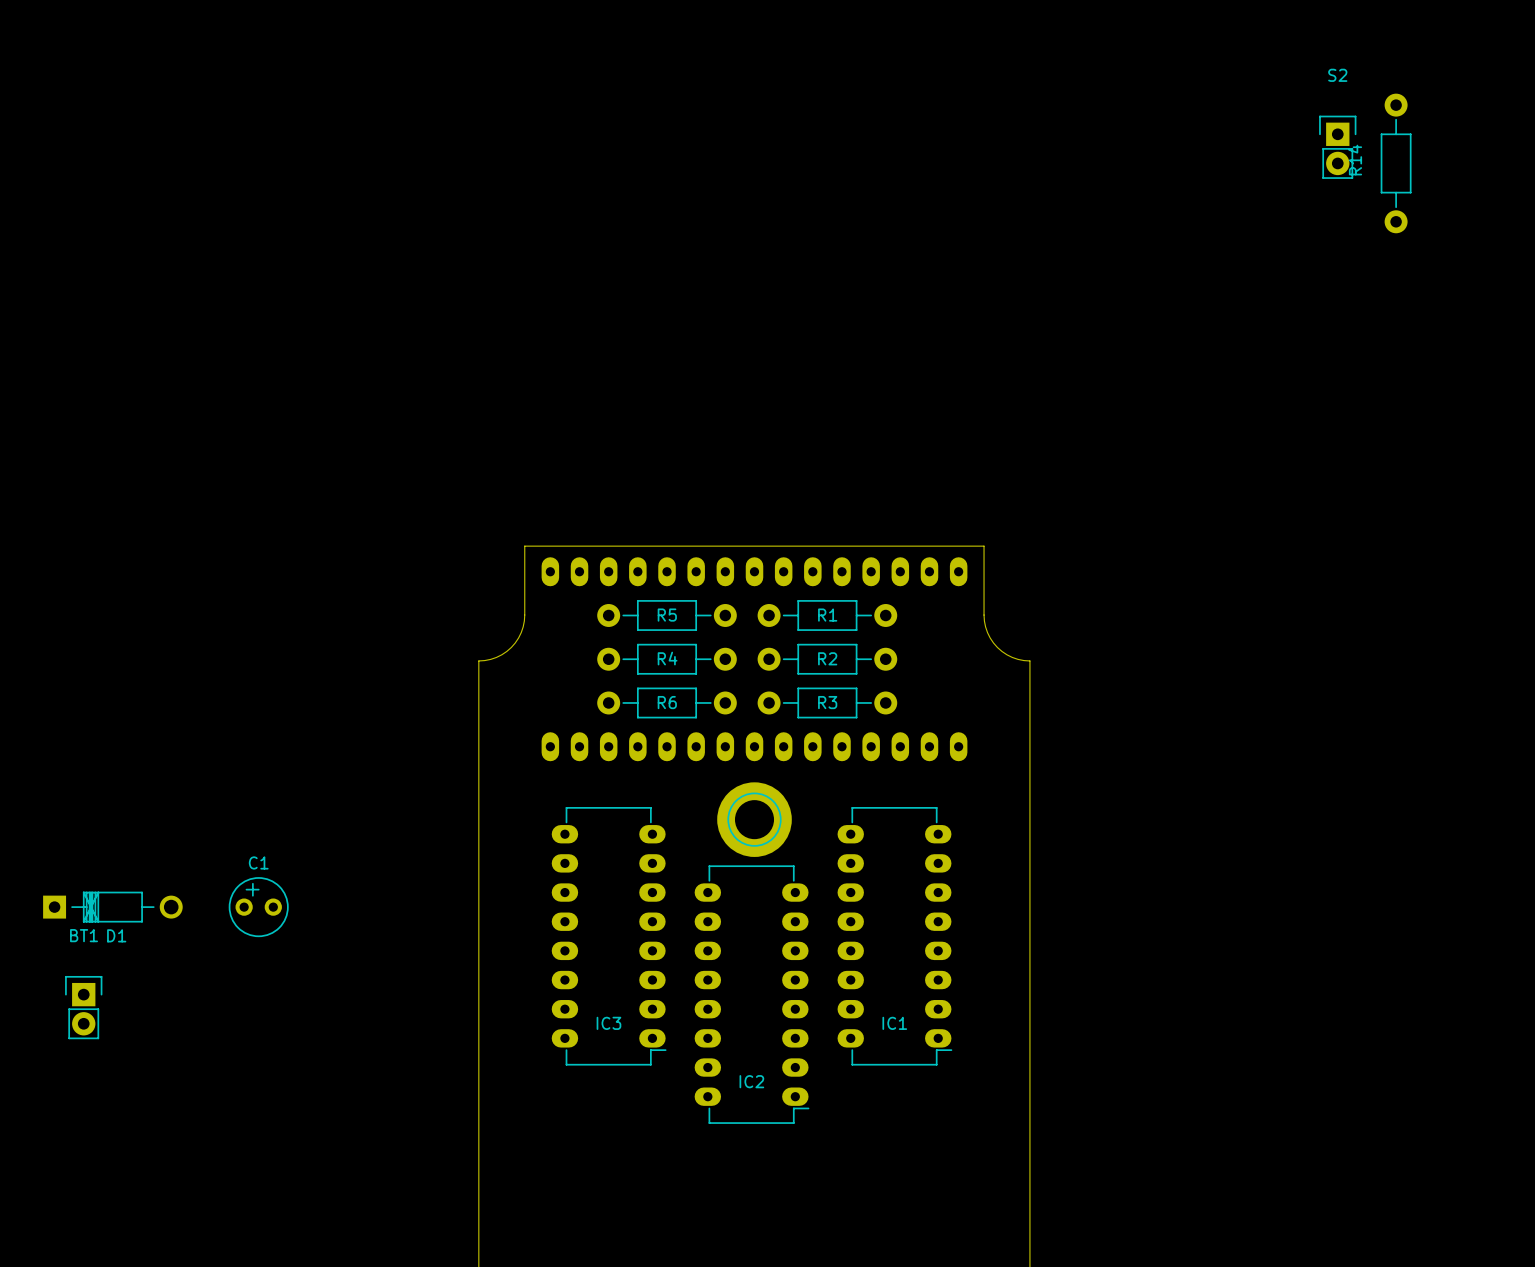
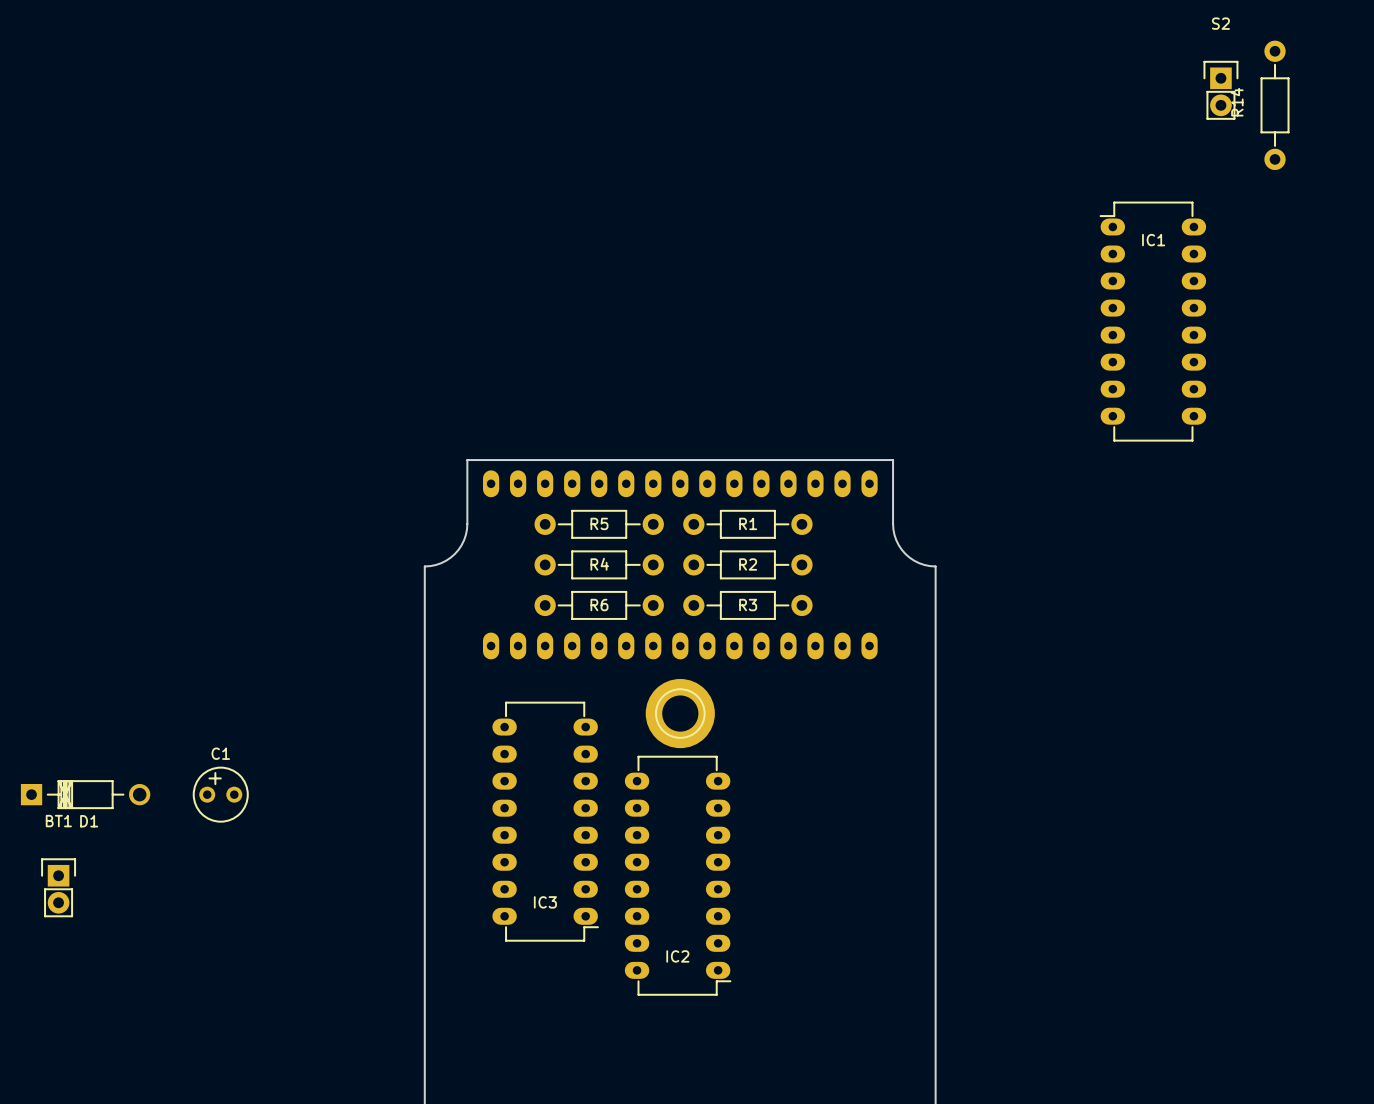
IC1 rotation: 0° (894, 936) -> 180° (1152, 321)
IC1 position: (894, 936) -> (1152, 321)

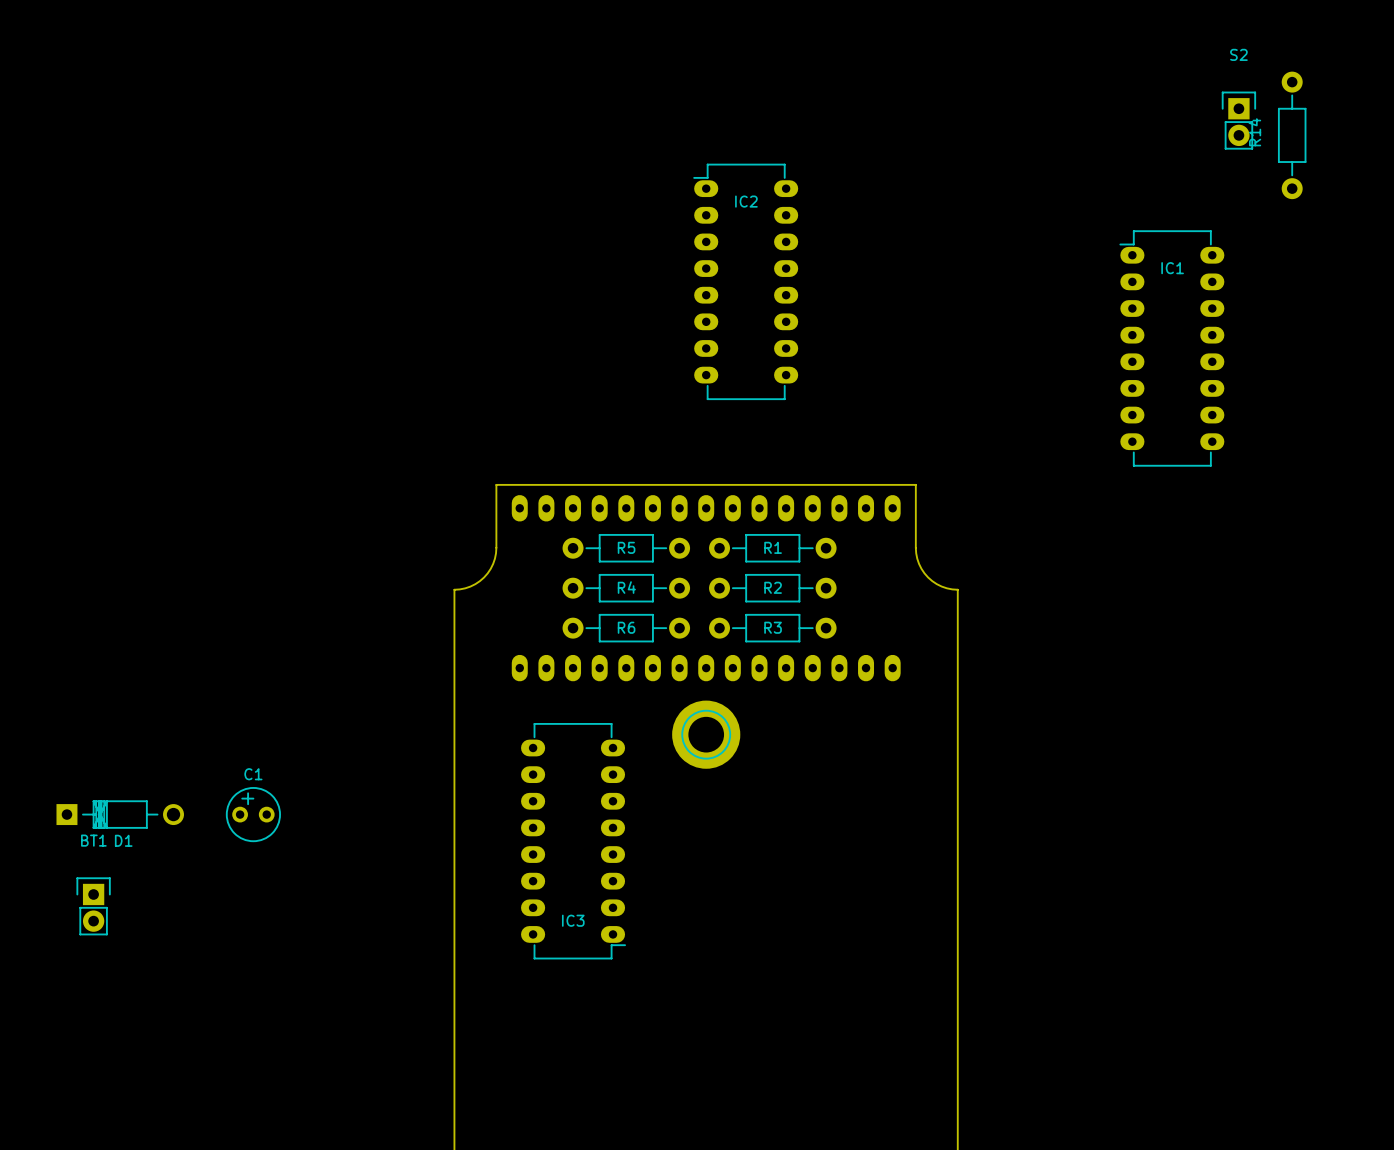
IC2 rotation: 0° (678, 875) -> 180° (745, 281)
IC2 position: (678, 875) -> (745, 281)

